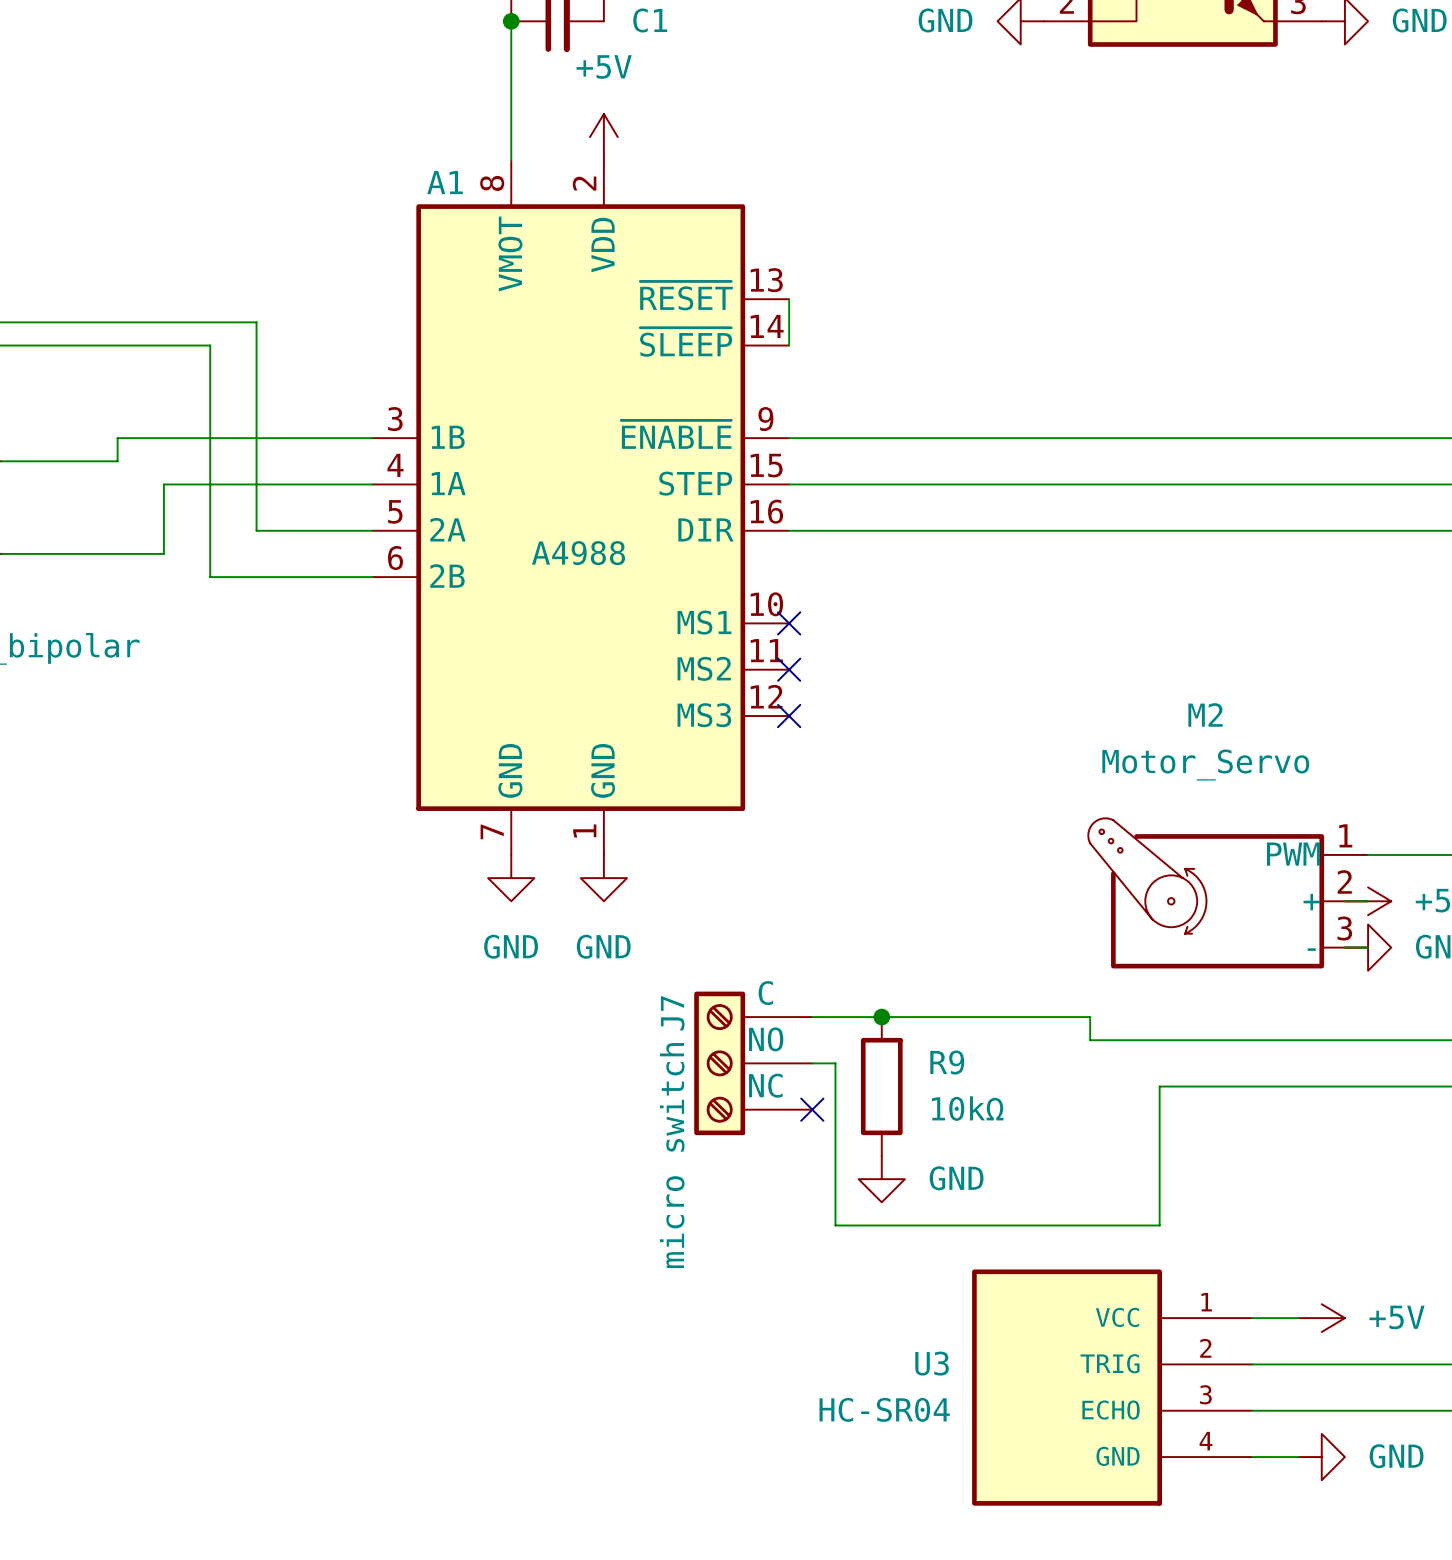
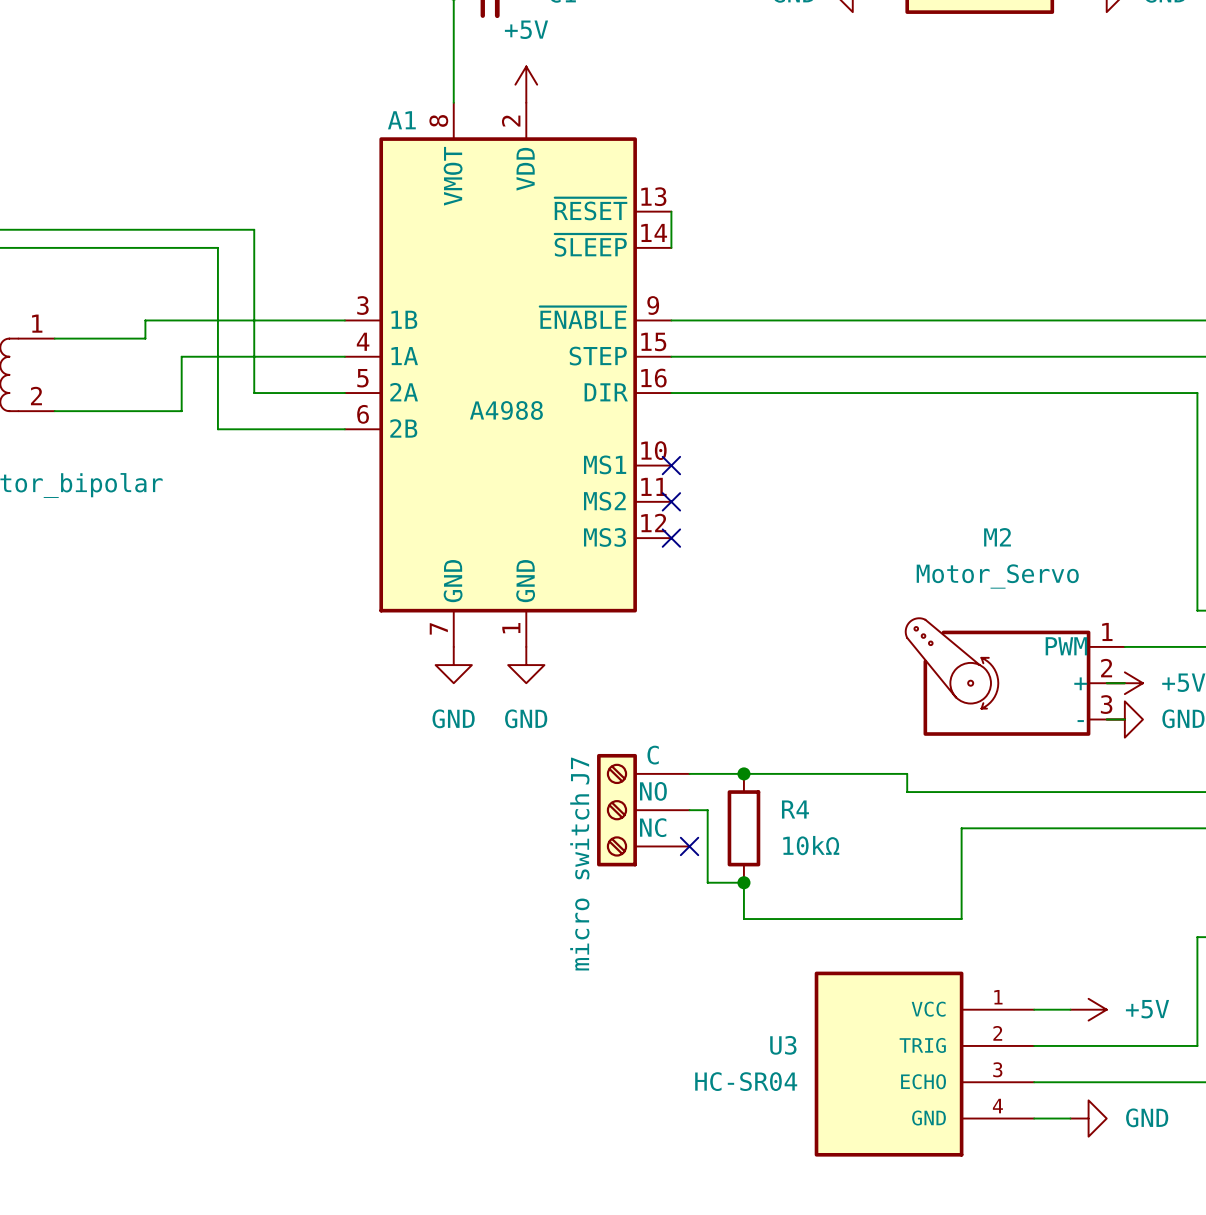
R9 name: R9 (947, 1062) -> R4 (795, 809)
wire: (835, 1156) (835, 1225) (1159, 1225) (1159, 1202) -> (707, 882) (743, 882) (743, 919) (961, 919)
junction: none -> (743, 882)
power symbol: GND (881, 1179) -> none

